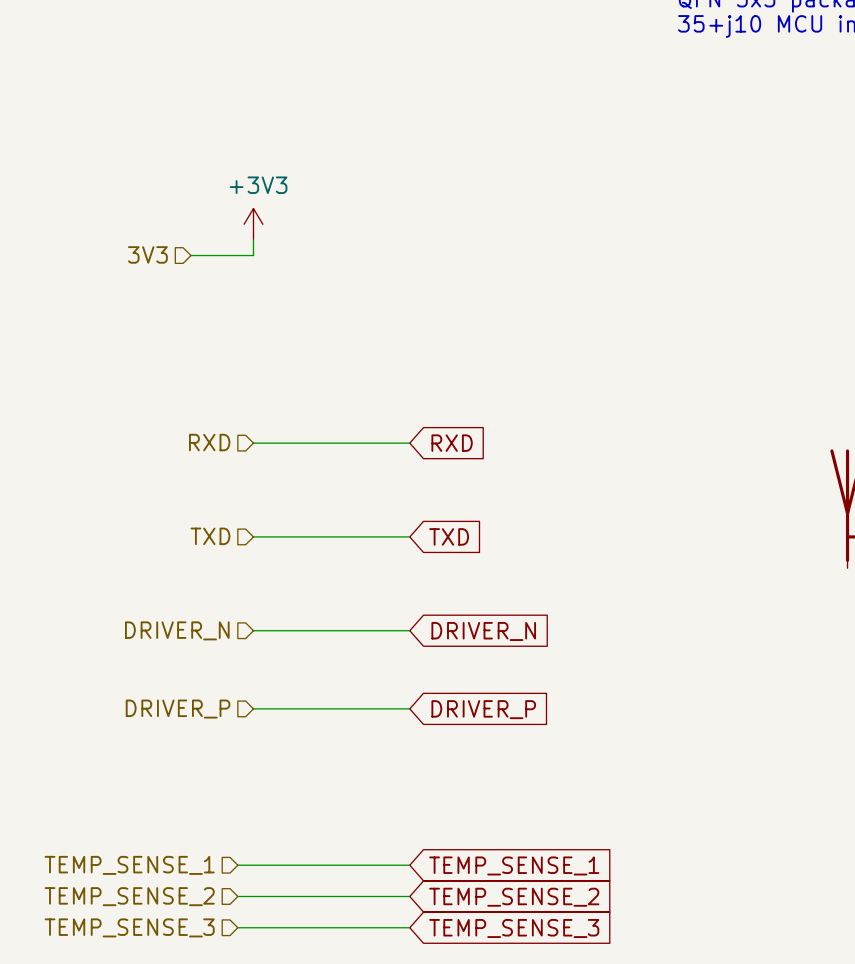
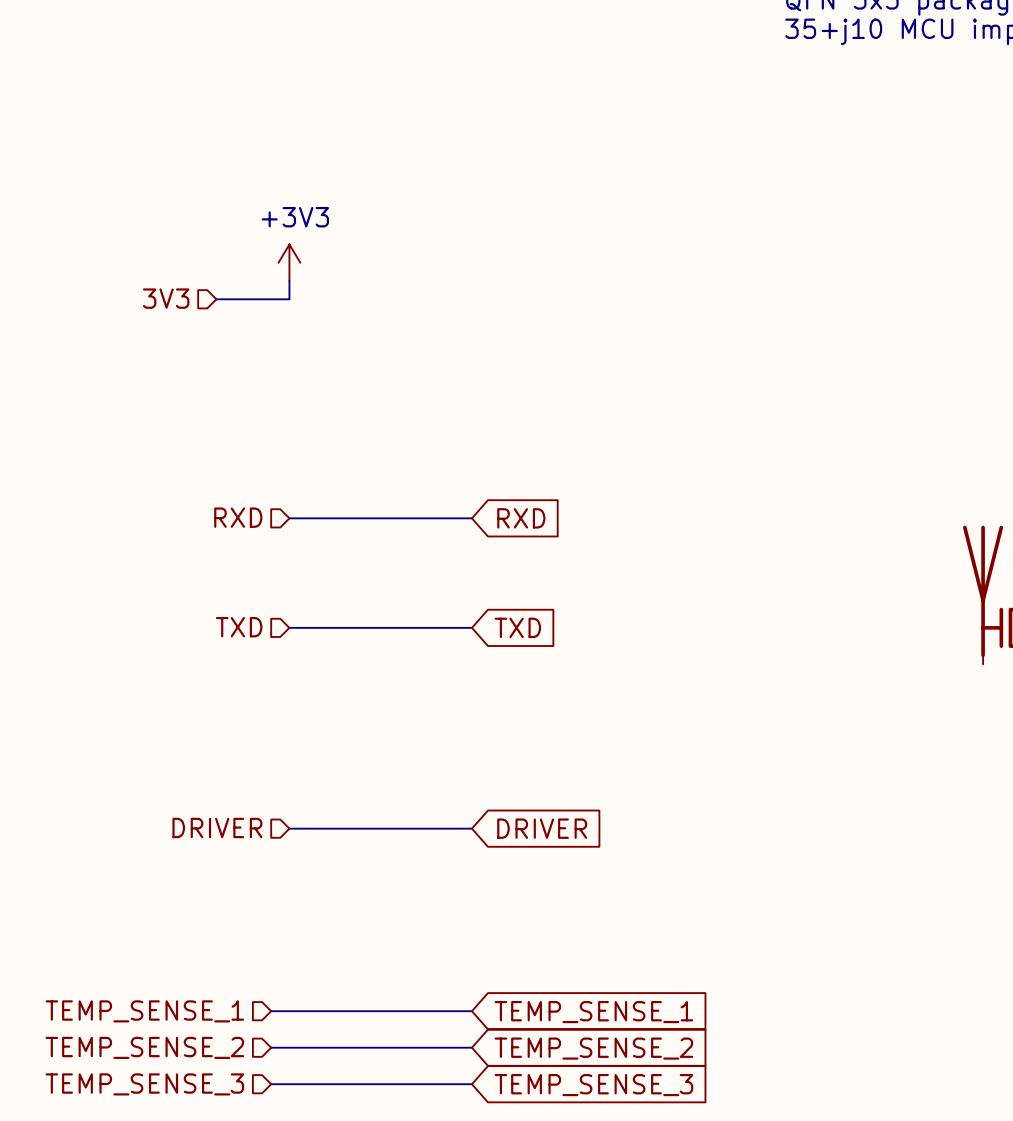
hierarchical label: DRIVER_N (177, 630) -> none
wire: (253, 630) (409, 630) -> none
global label: DRIVER_N (483, 631) -> none
hierarchical label: DRIVER_P (178, 709) -> DRIVER (217, 827)
global label: DRIVER_P (483, 709) -> DRIVER (542, 828)

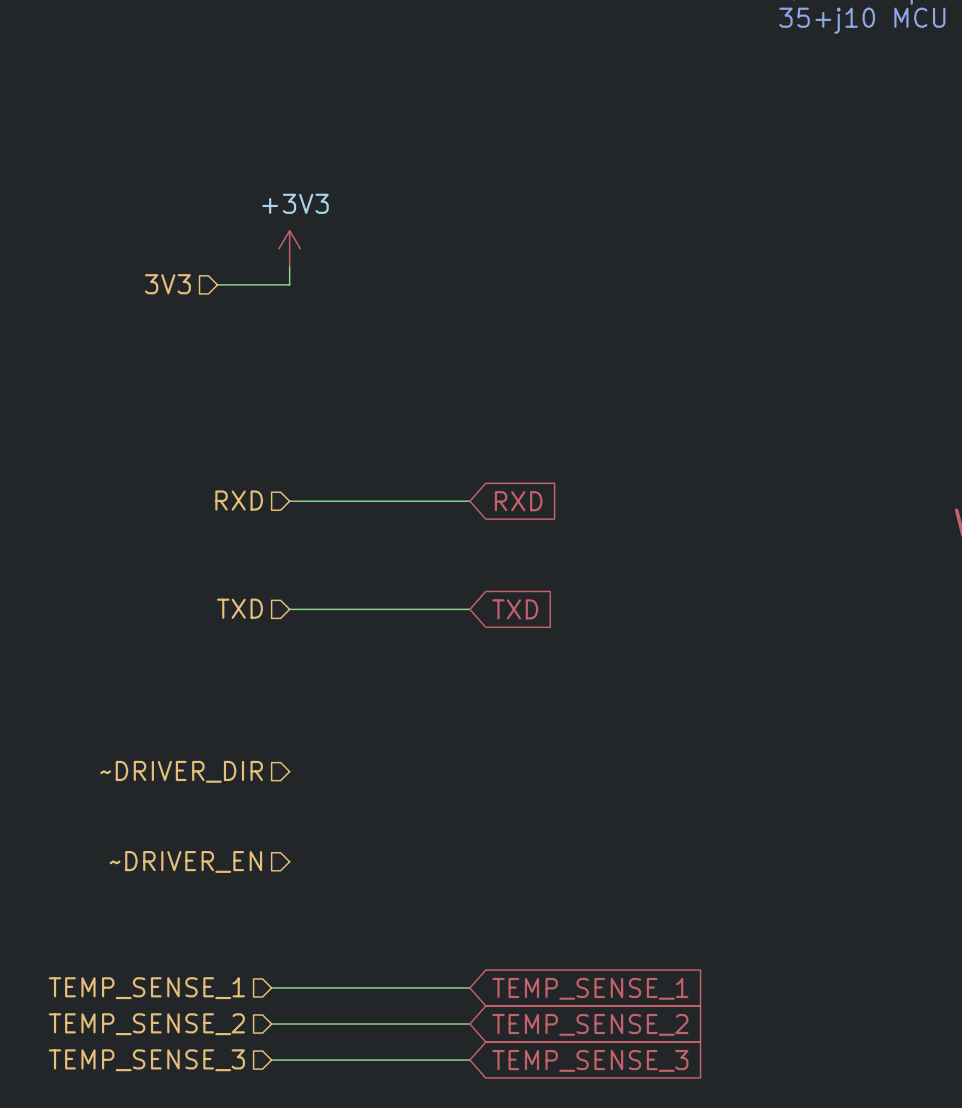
hierarchical label: DRIVER (217, 827) -> ~DRIVER_DIR (181, 771)
wire: (289, 828) (471, 828) -> none
global label: DRIVER (542, 828) -> none
hierarchical label: none -> ~DRIVER_EN (185, 861)

